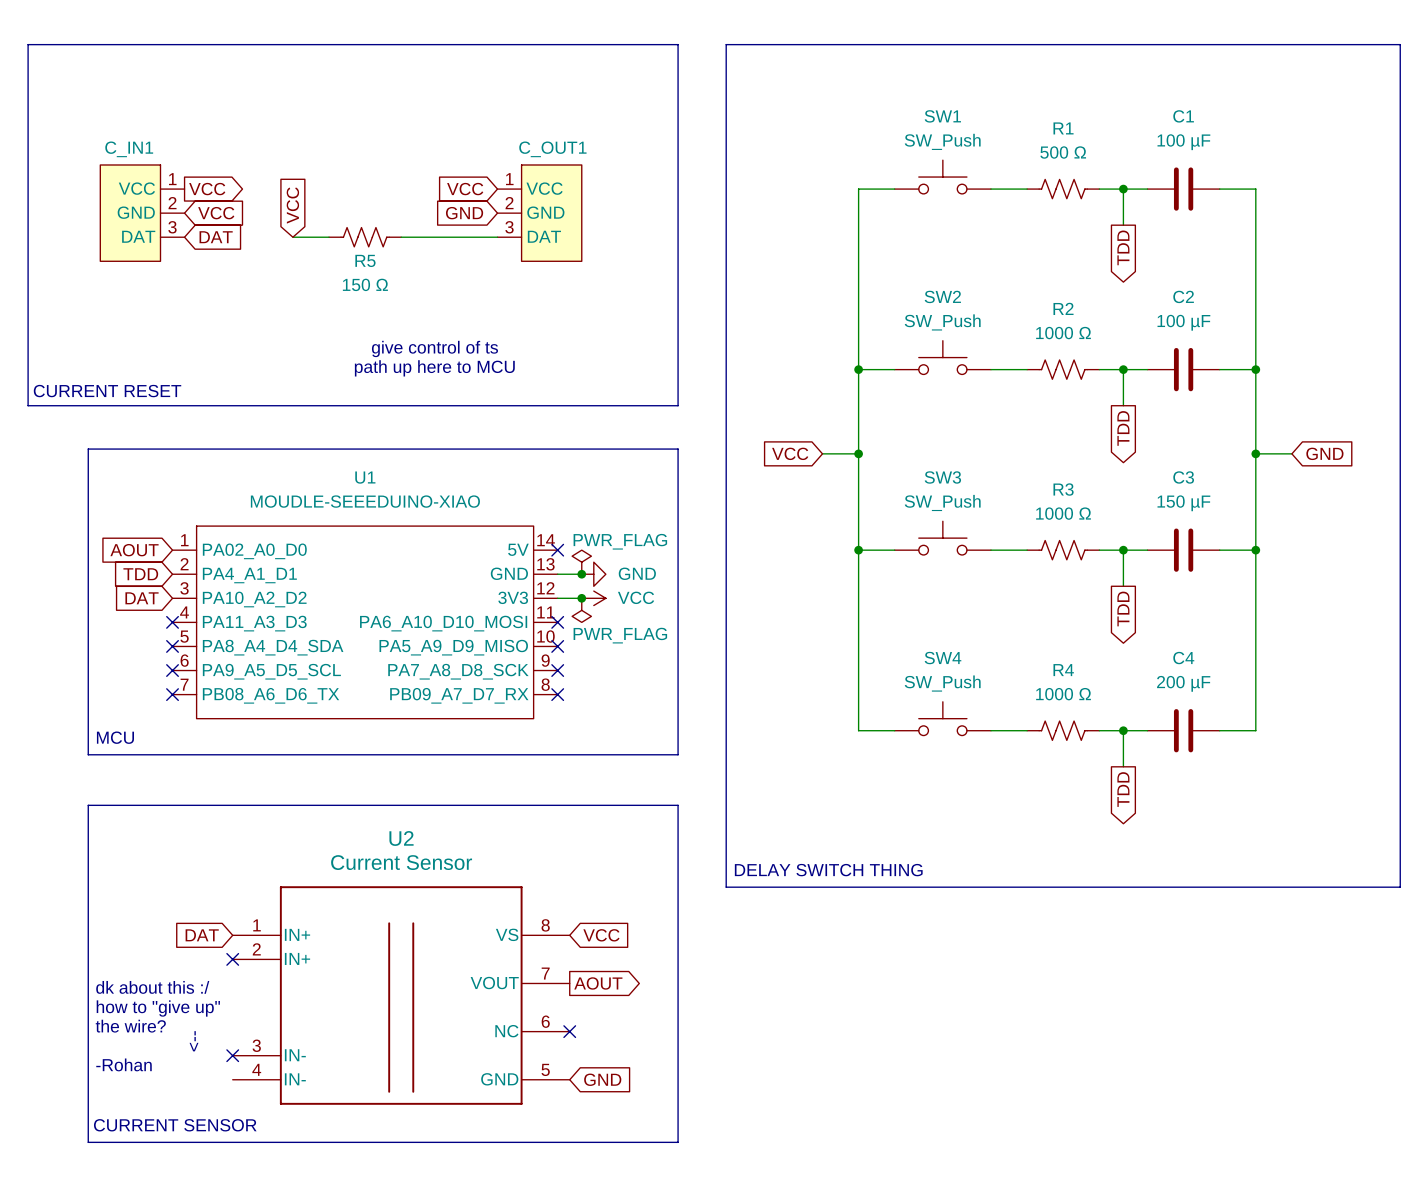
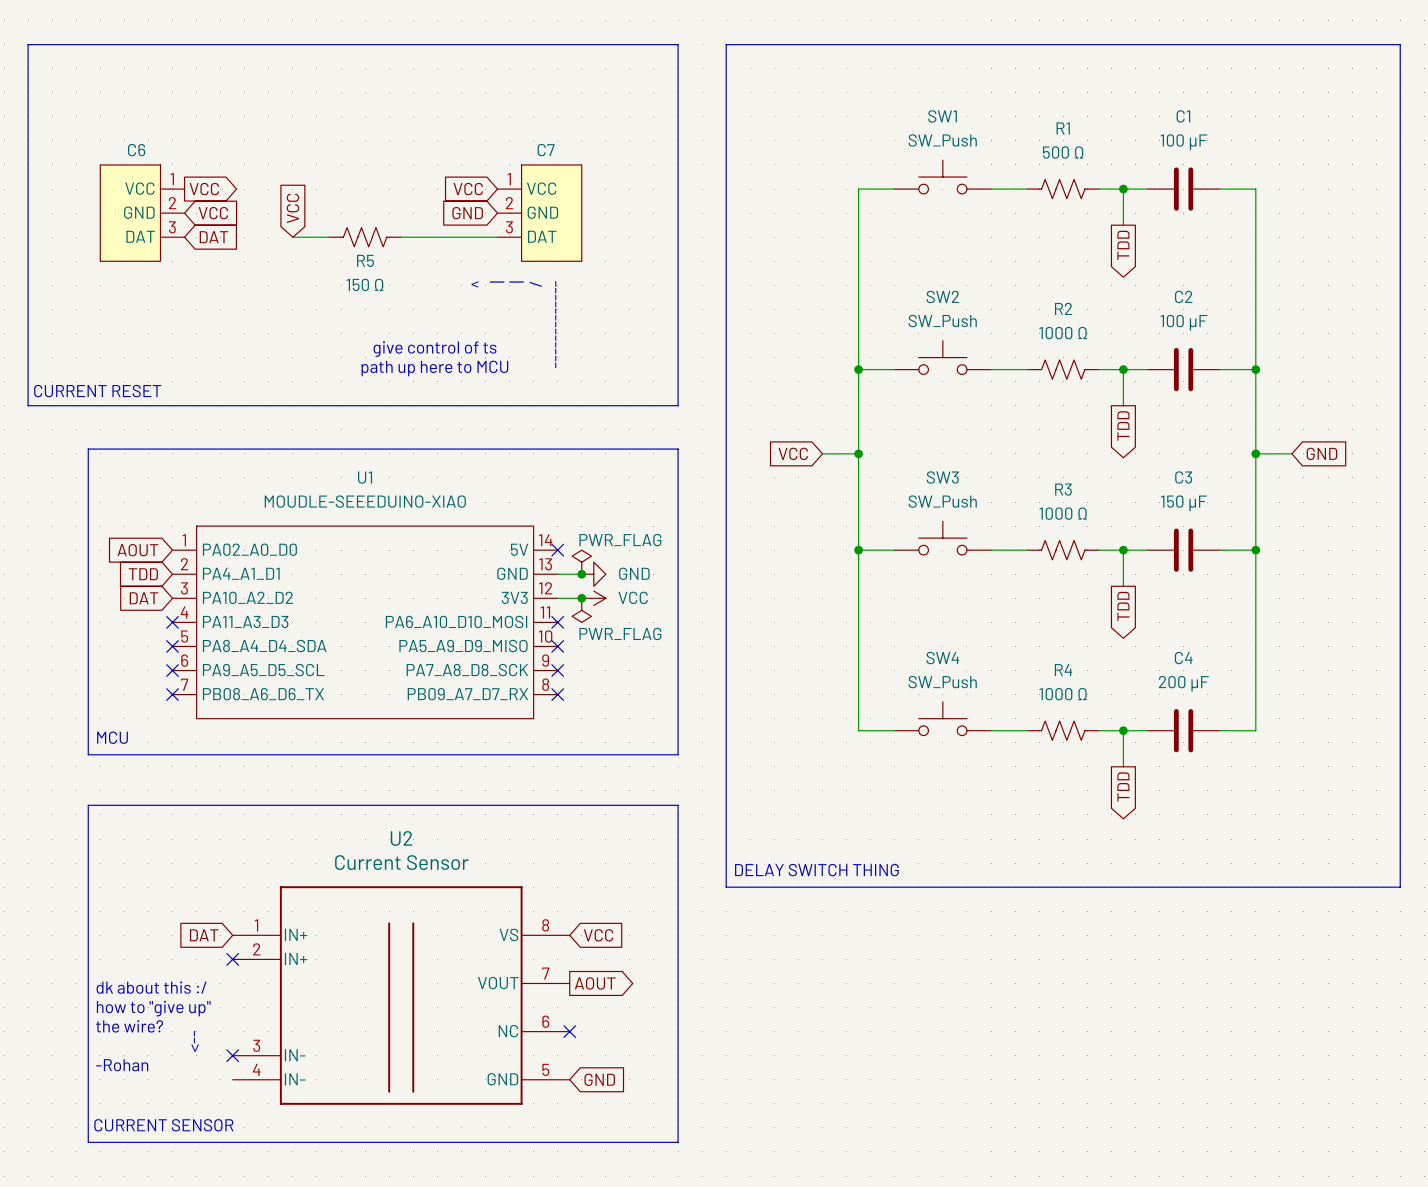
C_IN1 name: C_IN1 (129, 149) -> C6 (136, 150)
C_OUT1 name: C_OUT1 (552, 149) -> C7 (546, 150)
text: none -> | (497, 282)
text: none -> | (516, 282)
text: none -> / (535, 284)
text: none -> ^ (474, 284)
text: none -> ------------- (555, 324)

